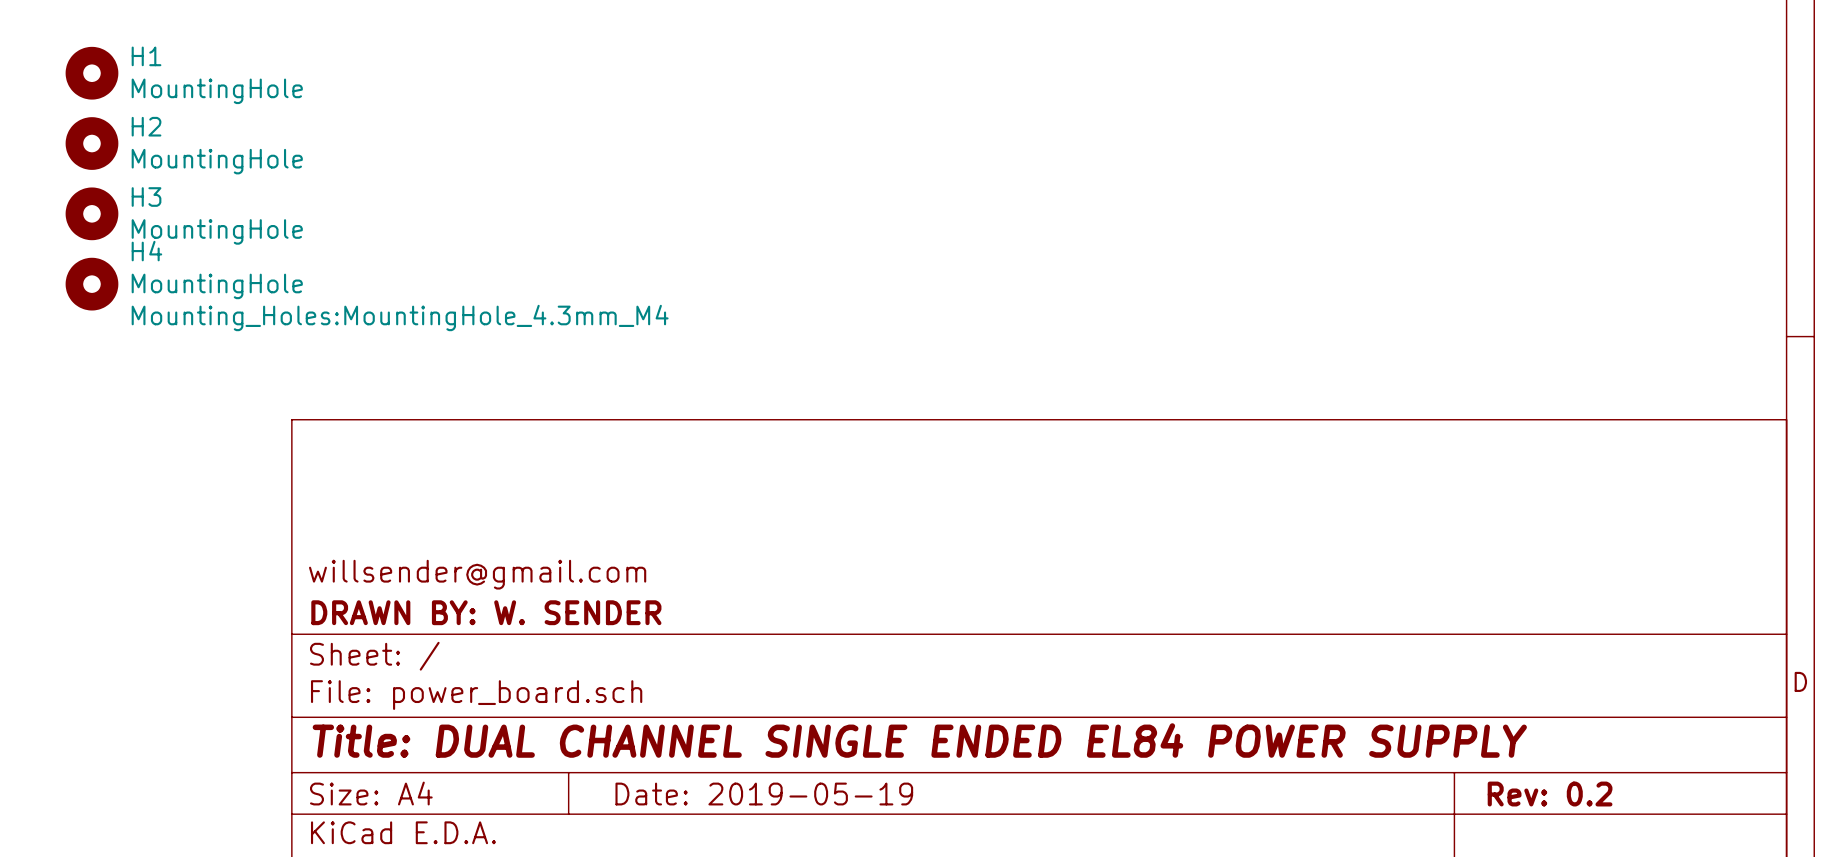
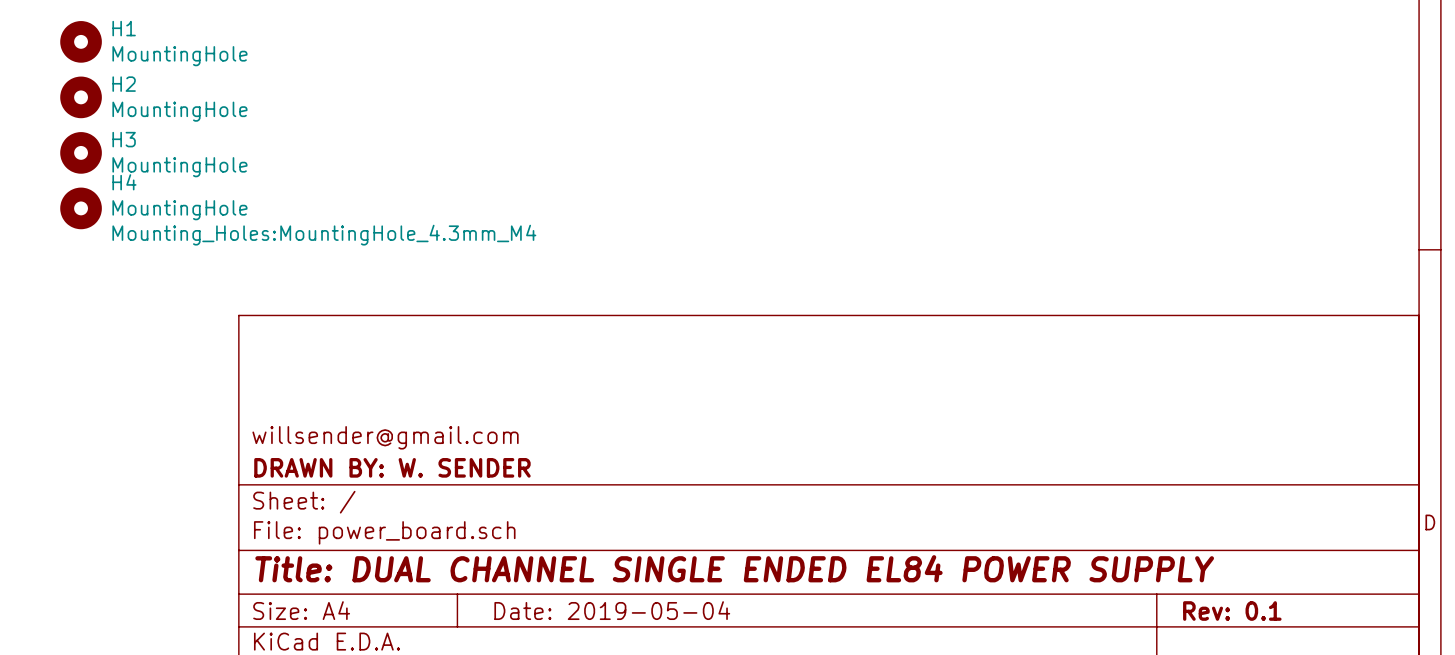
title block: Date: 2019-05-19 (764, 794) -> Date: 2019-05-04 (612, 610)
title block: Rev: 0.2 (1550, 794) -> Rev: 0.1 (1232, 610)

